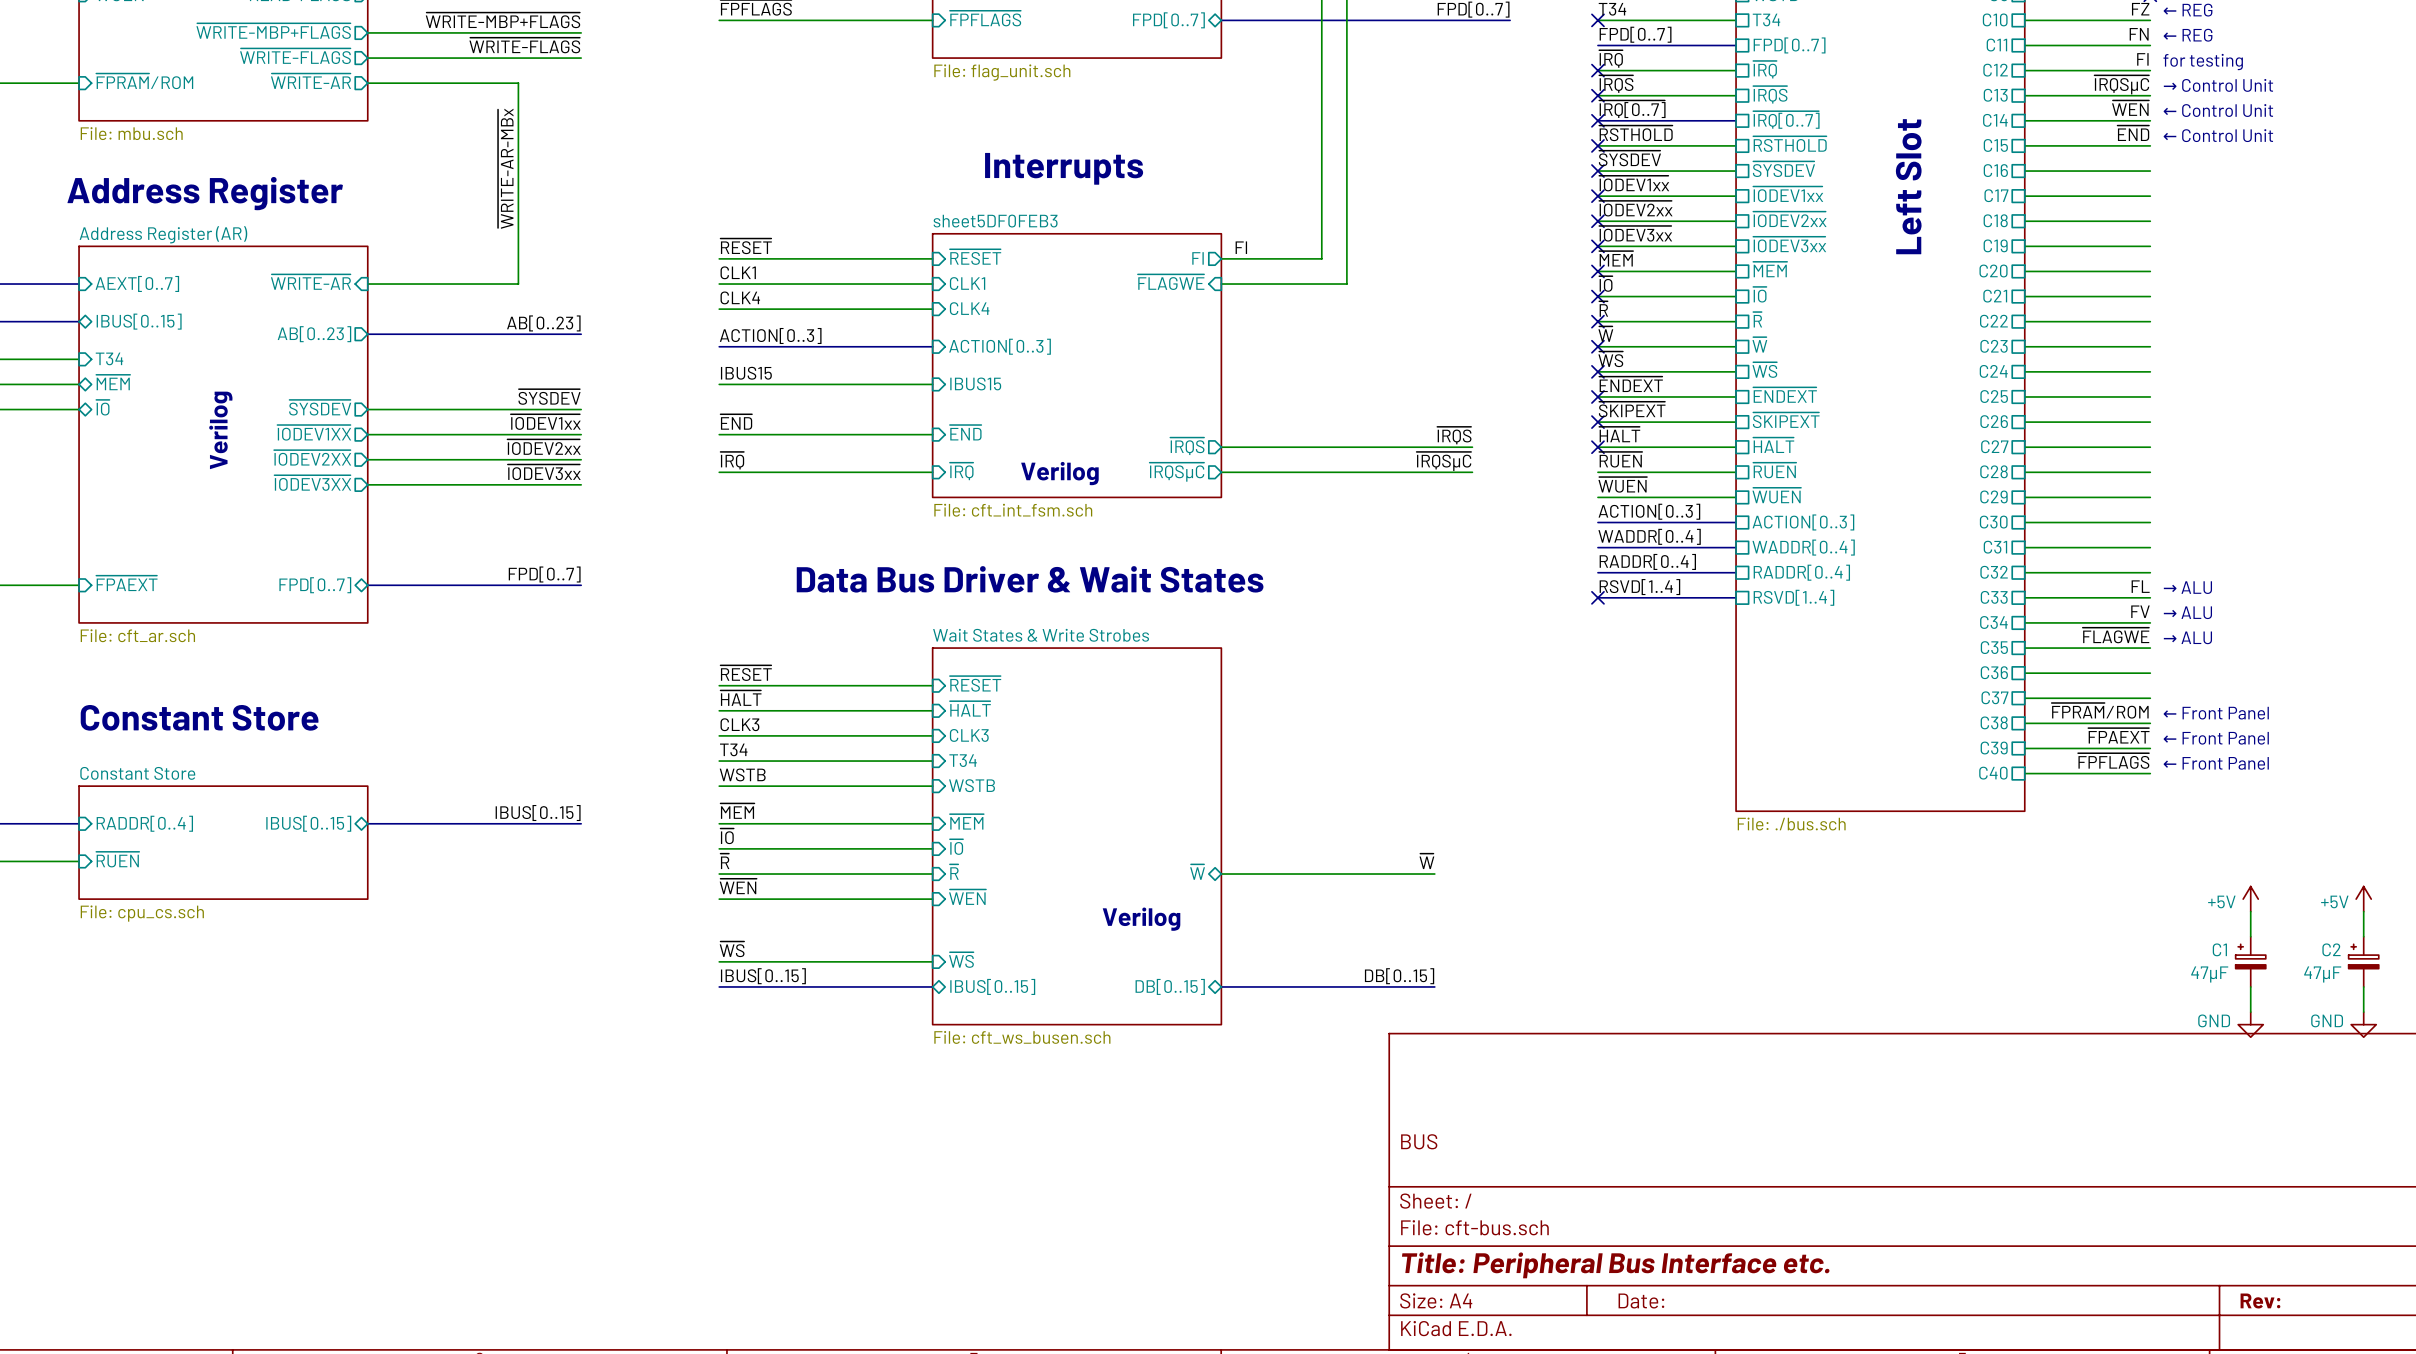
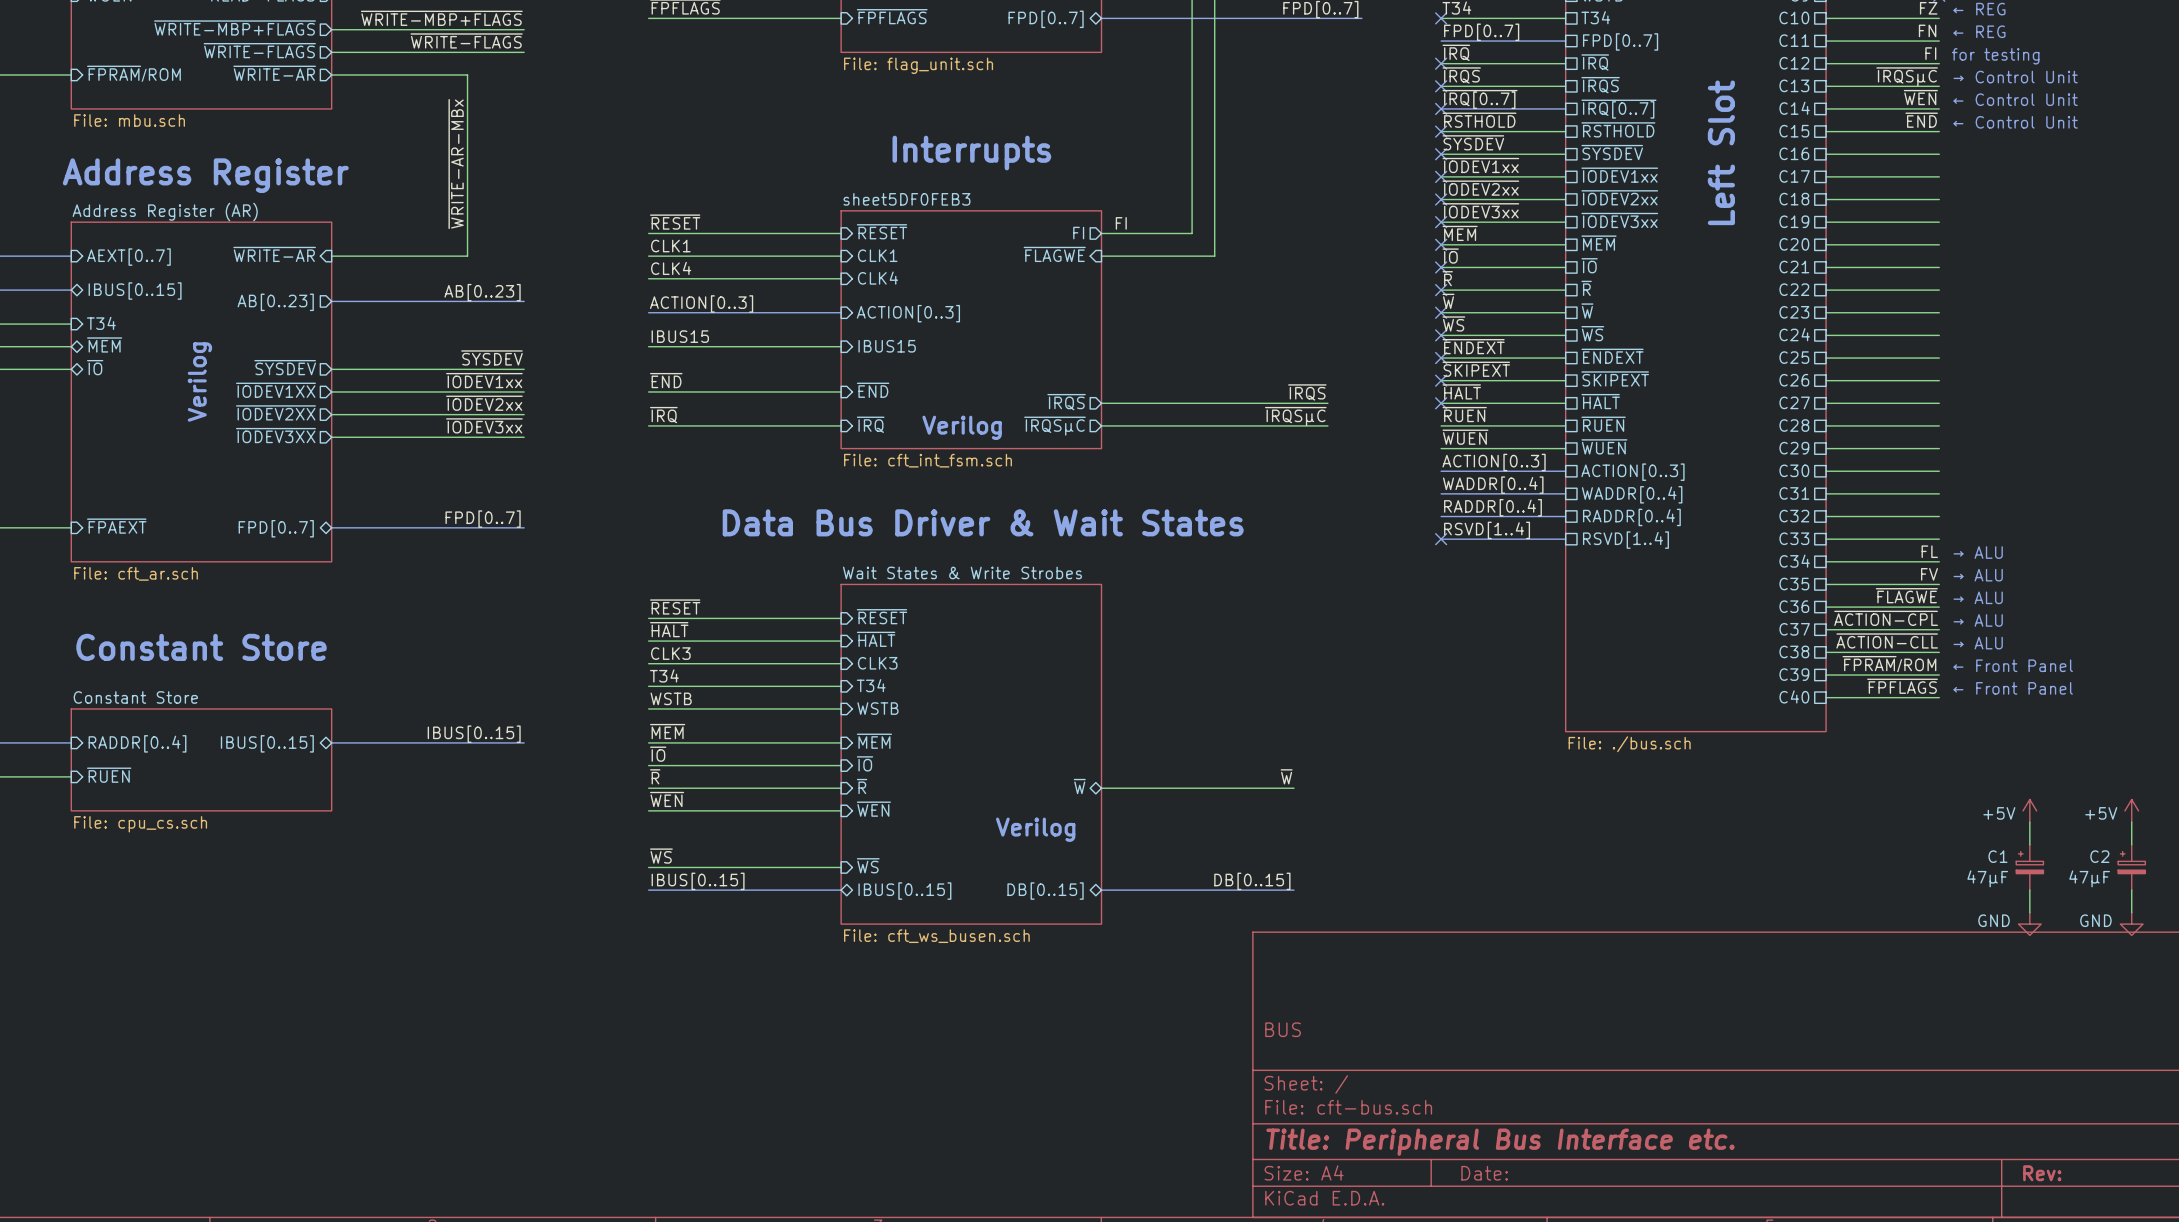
label: FL (2140, 586) -> none
text: → ALU (2187, 587) -> none
label: FV (2140, 611) -> FL (1929, 551)
label: ~{FLAGWE} (2115, 635) -> FV (1929, 574)
label: none -> ~{FLAGWE} (1906, 595)
text: none -> → ALU (1978, 597)
label: none -> ~{ACTION-CPL} (1886, 618)
text: none -> → ALU (1978, 620)
label: ~{FPRAM}∕ROM (2100, 710) -> ~{ACTION-CLL} (1887, 640)
text: ← Front Panel (2216, 713) -> → ALU (1978, 643)
label: ~{FPAEXT} (2118, 735) -> ~{FPRAM}∕ROM (1889, 664)

